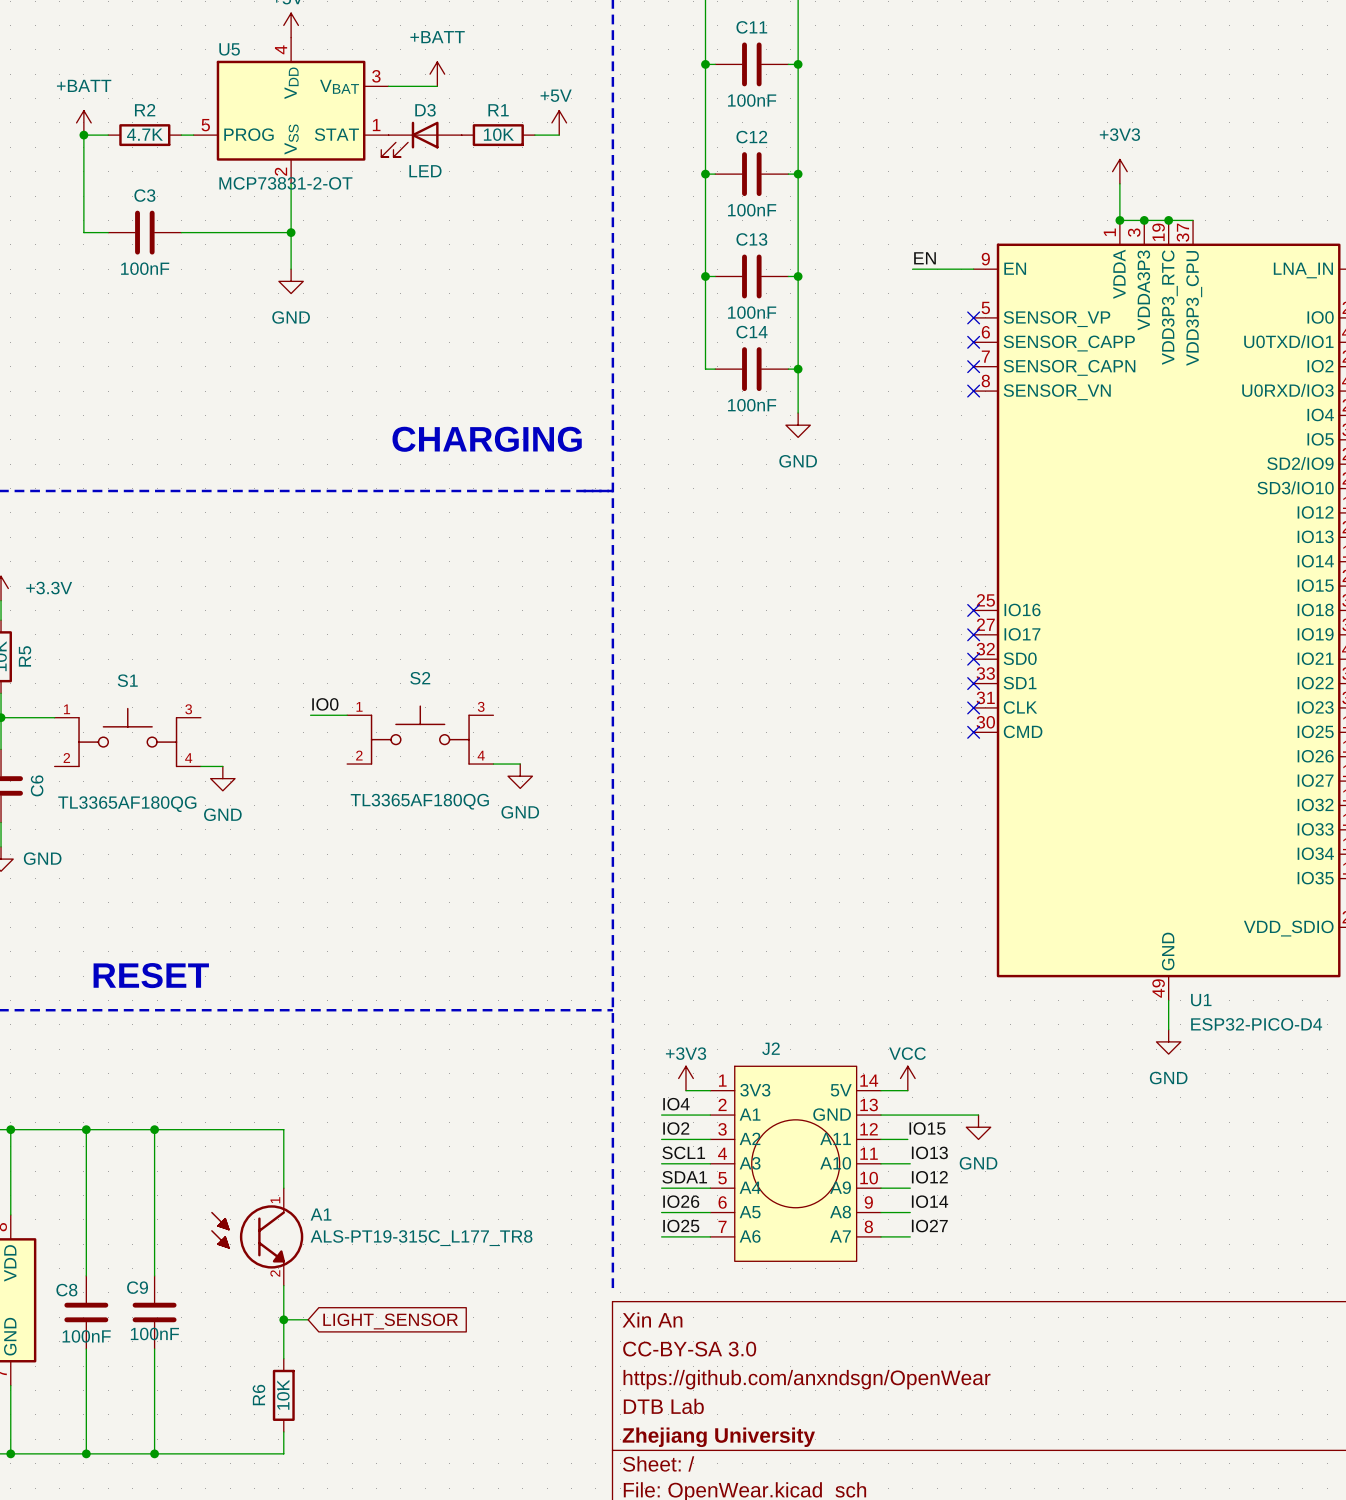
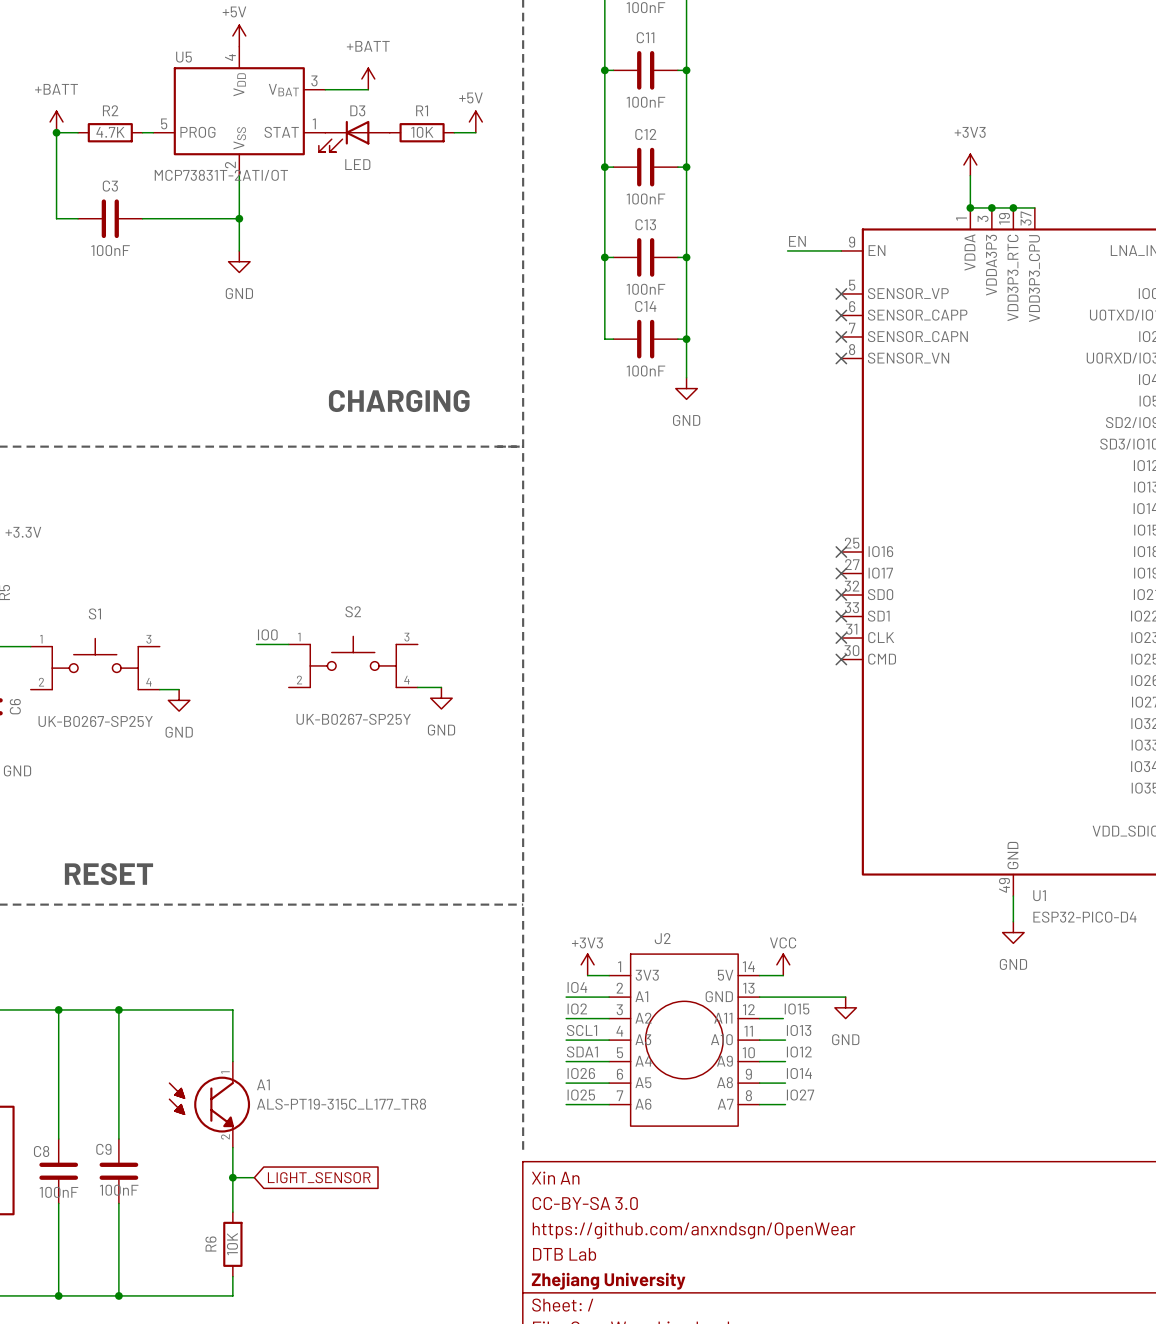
U5 value: MCP73831-2-OT (285, 183) -> MCP73831T-2ATI/OT (221, 175)
S2 value: TL3365AF180QG (419, 801) -> UK-B0267-SP25Y (353, 719)
S1 value: TL3365AF180QG (127, 804) -> UK-B0267-SP25Y (95, 721)

